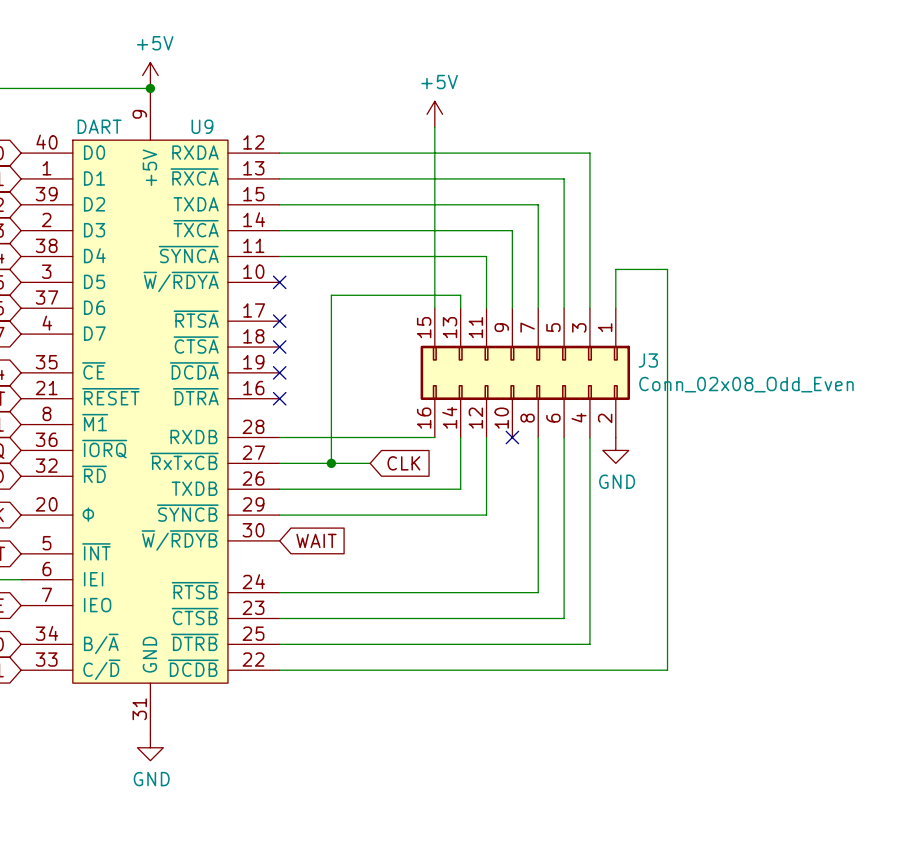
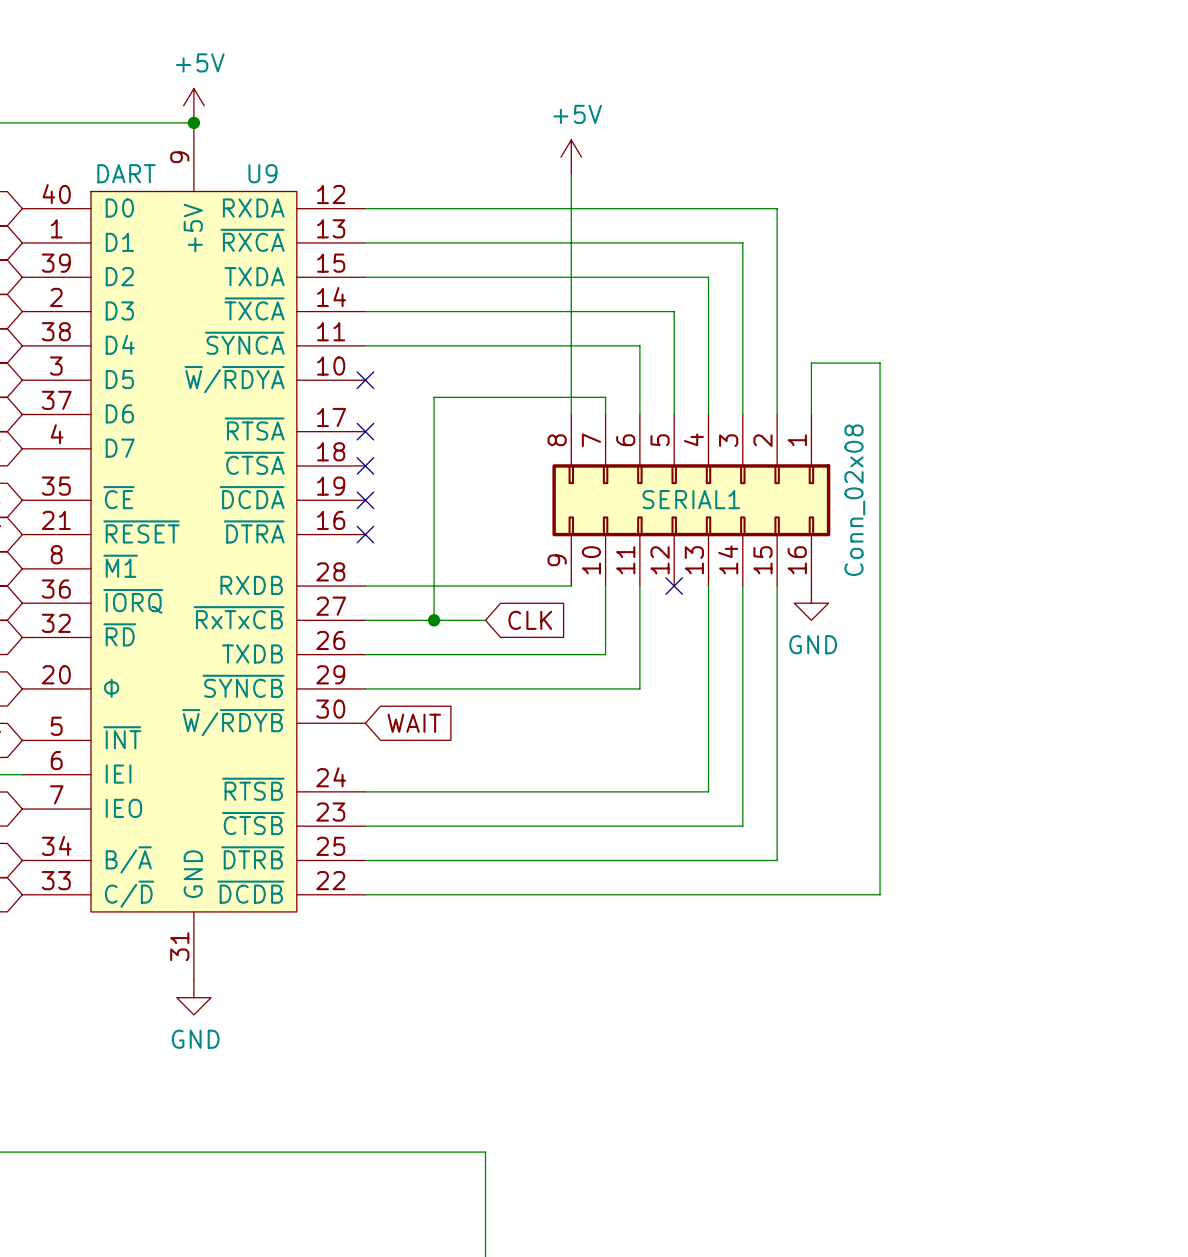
J3 symbol: [420, 308, 631, 438] -> [552, 414, 831, 587]
J3 name: J3 (648, 360) -> SERIAL1 (691, 499)
J3 value: Conn_02x08_Odd_Even (746, 384) -> Conn_02x08 (854, 500)

